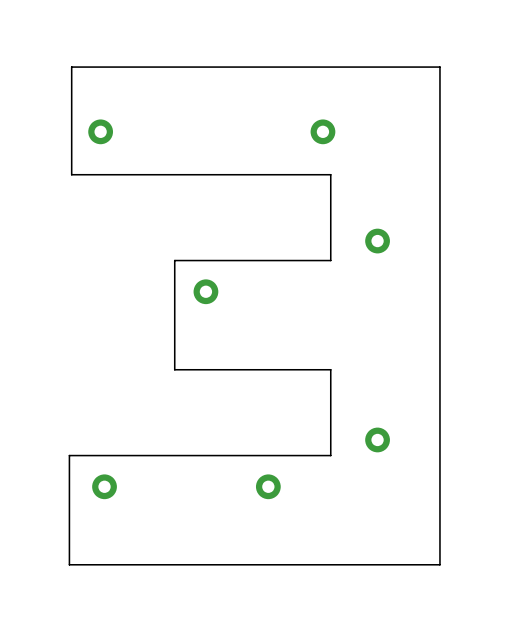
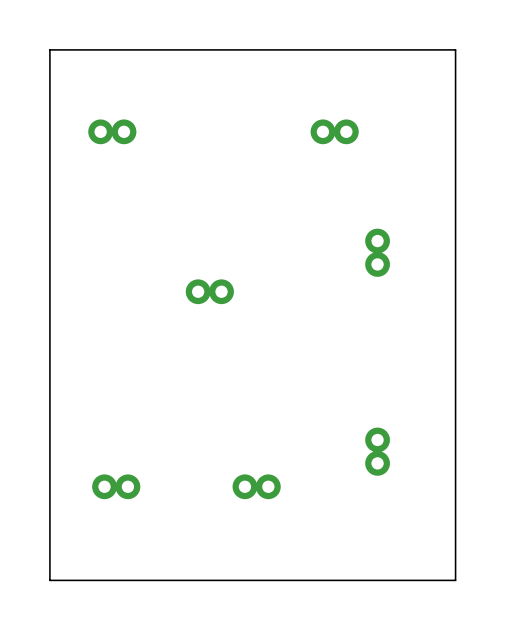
board edge: (439, 67) (71, 67) (71, 174) (330, 174) (330, 260) (174, 260) (174, 369) (330, 369) (330, 455) (69, 455) (69, 564) (439, 564) (439, 67) -> (455, 49) (455, 580) (49, 580) (49, 49) (455, 49)
part: none -> (124, 131)
part: none -> (346, 131)
part: none -> (377, 264)
part: none -> (198, 291)
part: (205, 291) -> none
part: none -> (221, 291)
part: none -> (377, 463)
part: none -> (127, 486)
part: none -> (244, 486)

